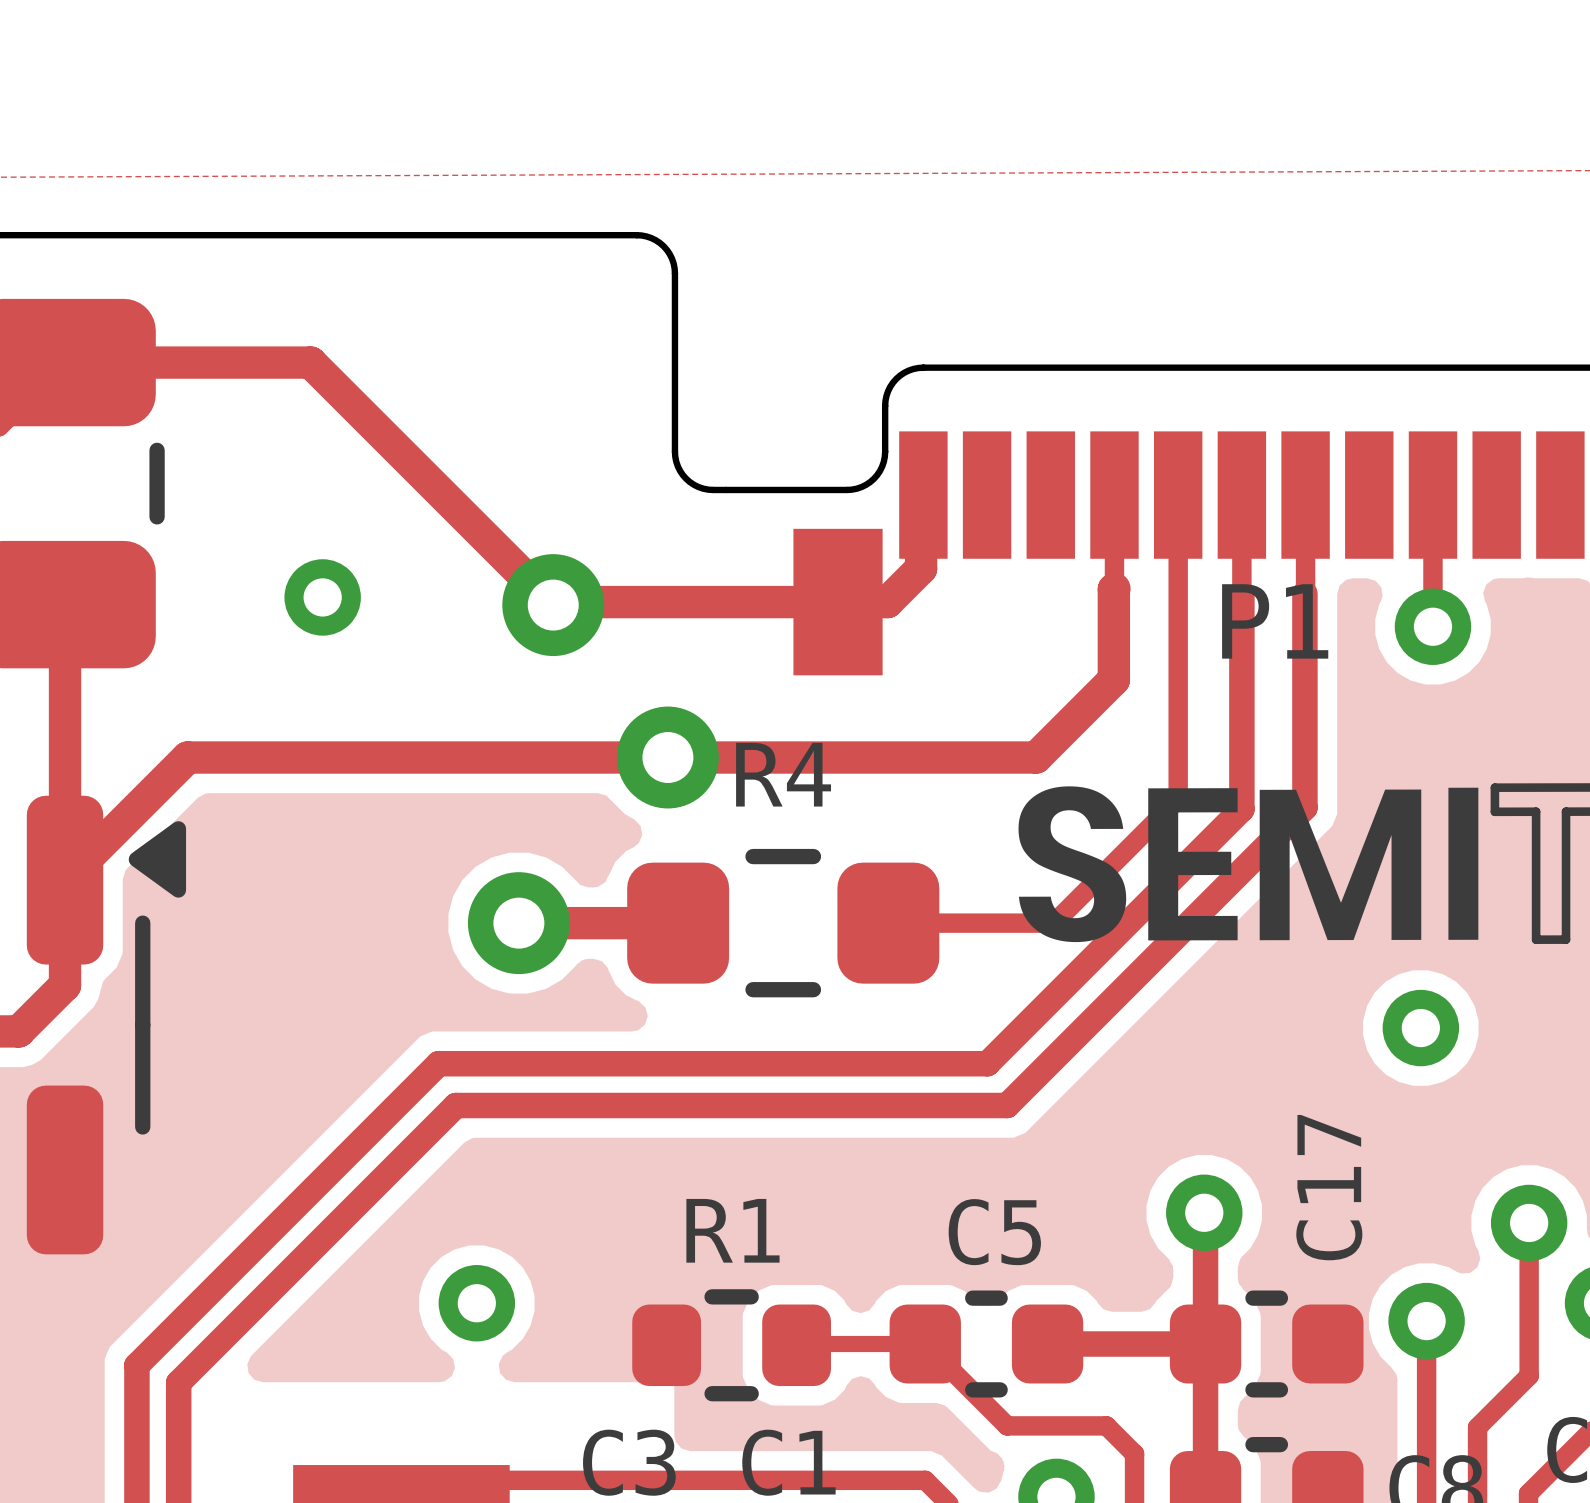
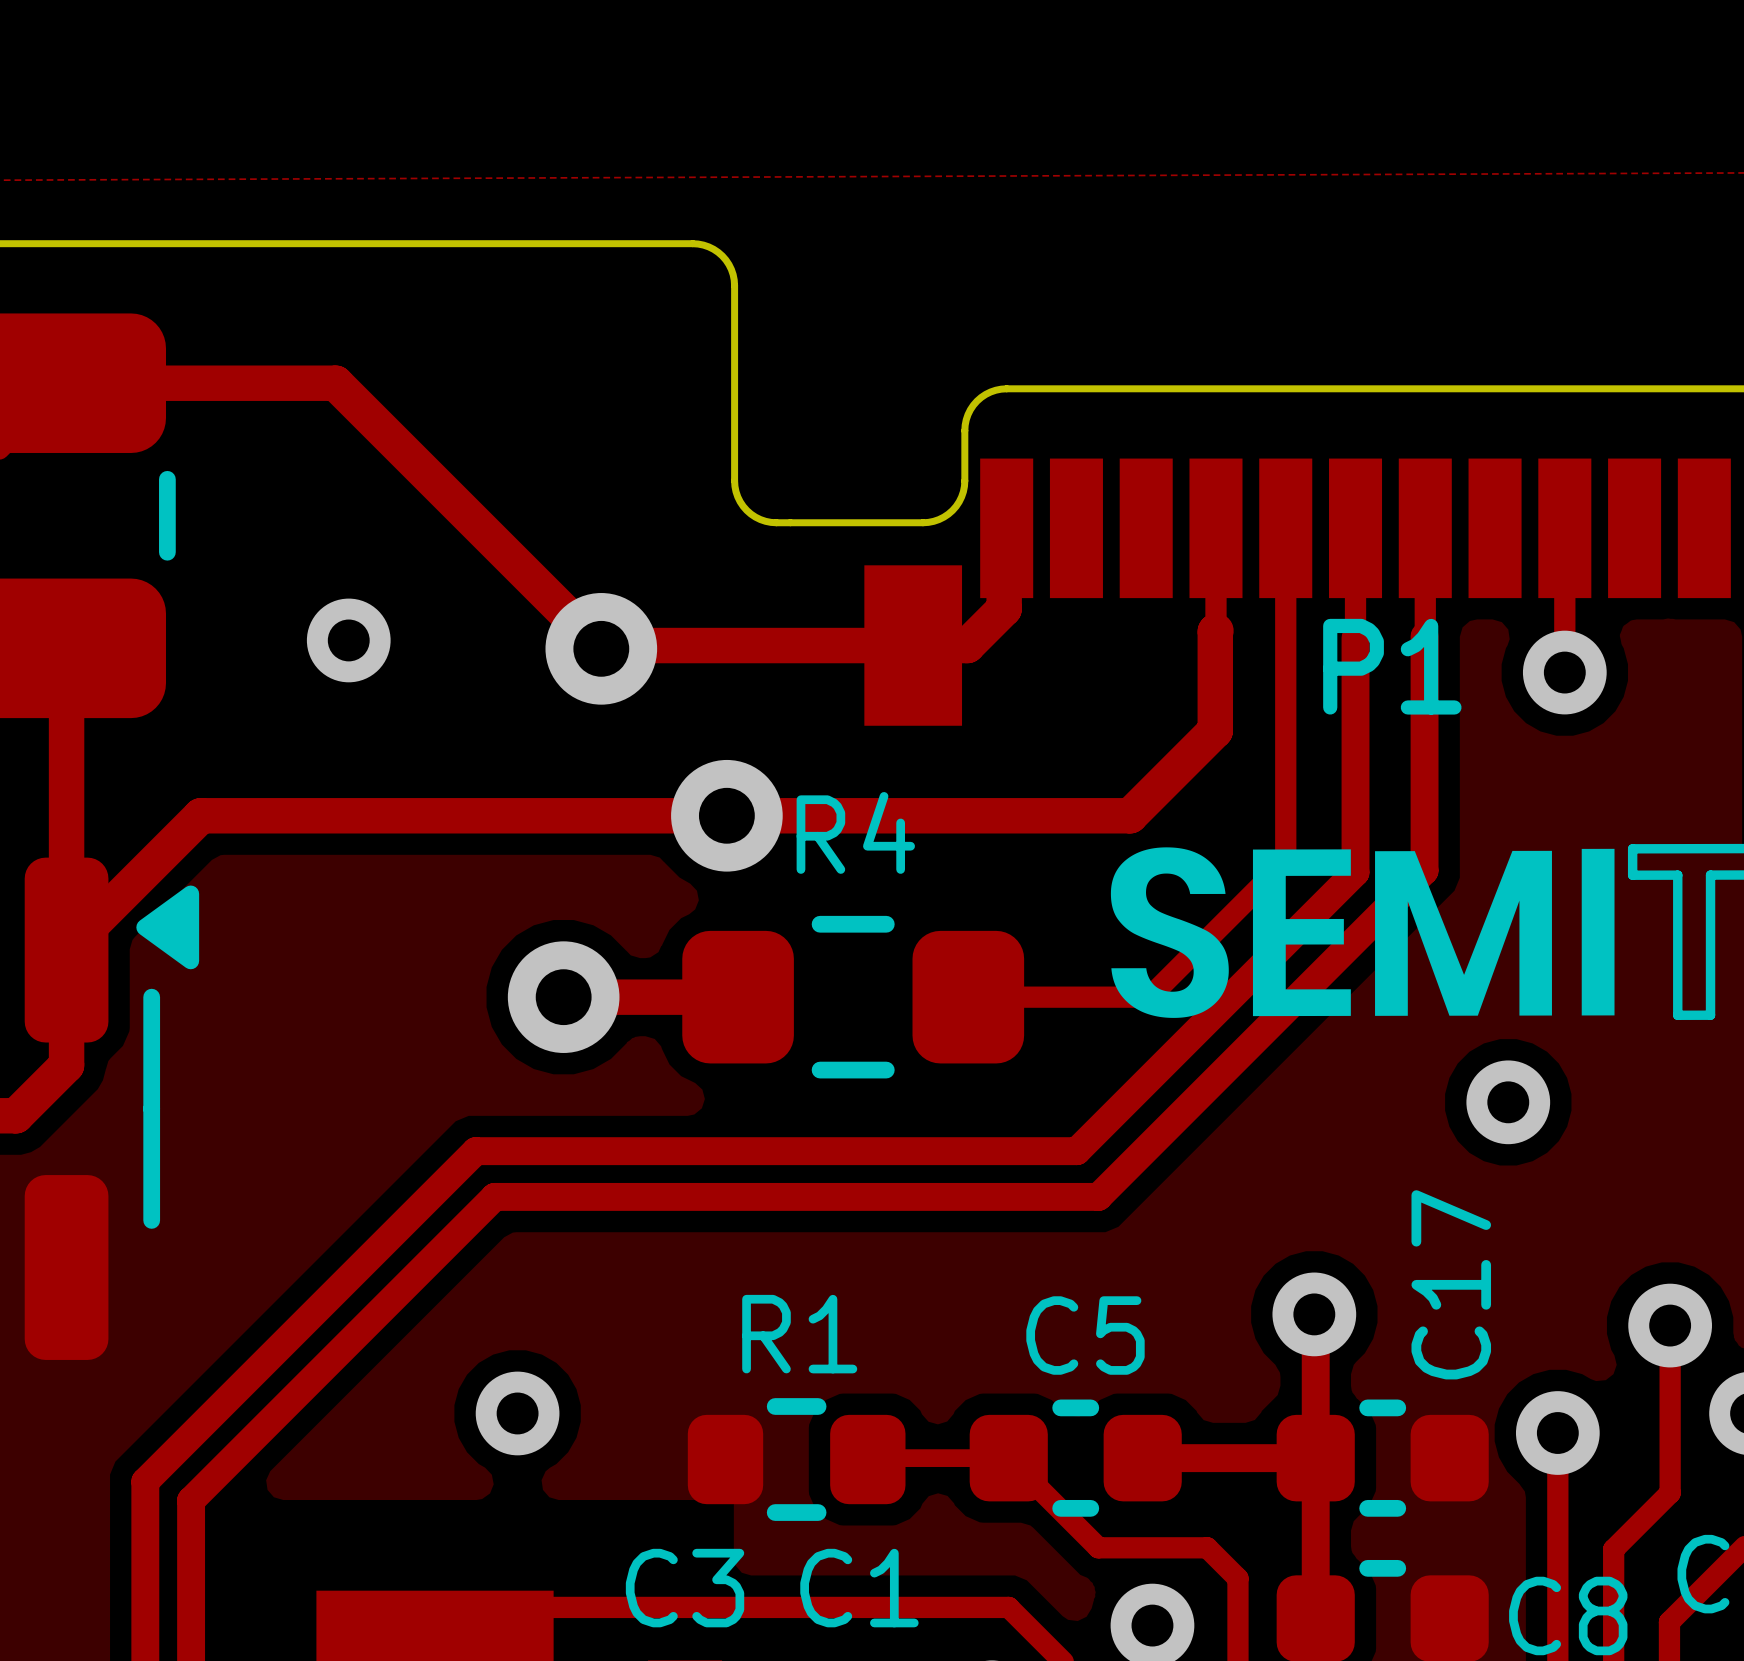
via position: (1420, 1028) -> (1508, 1102)

